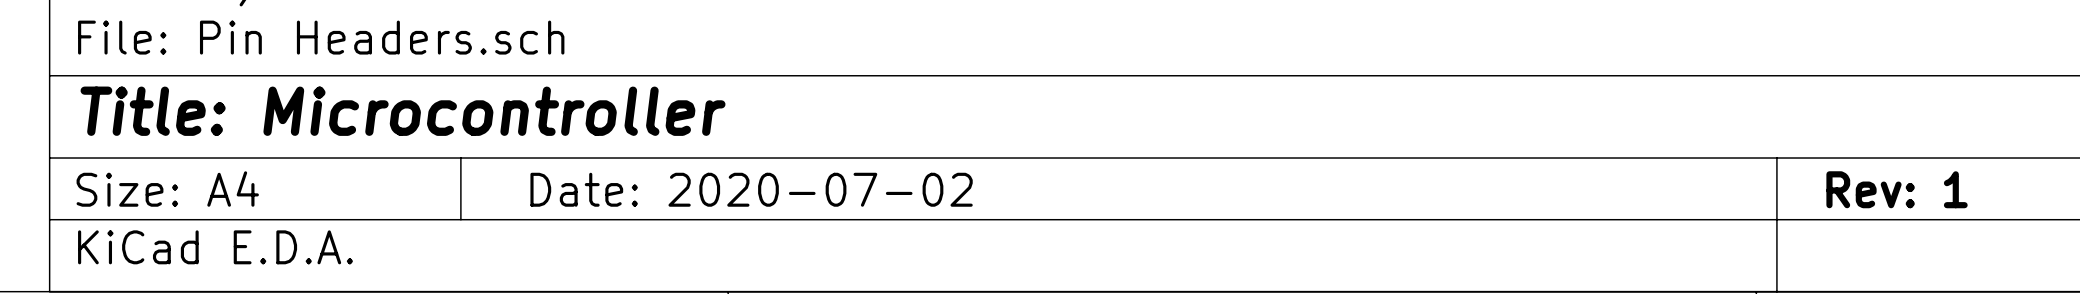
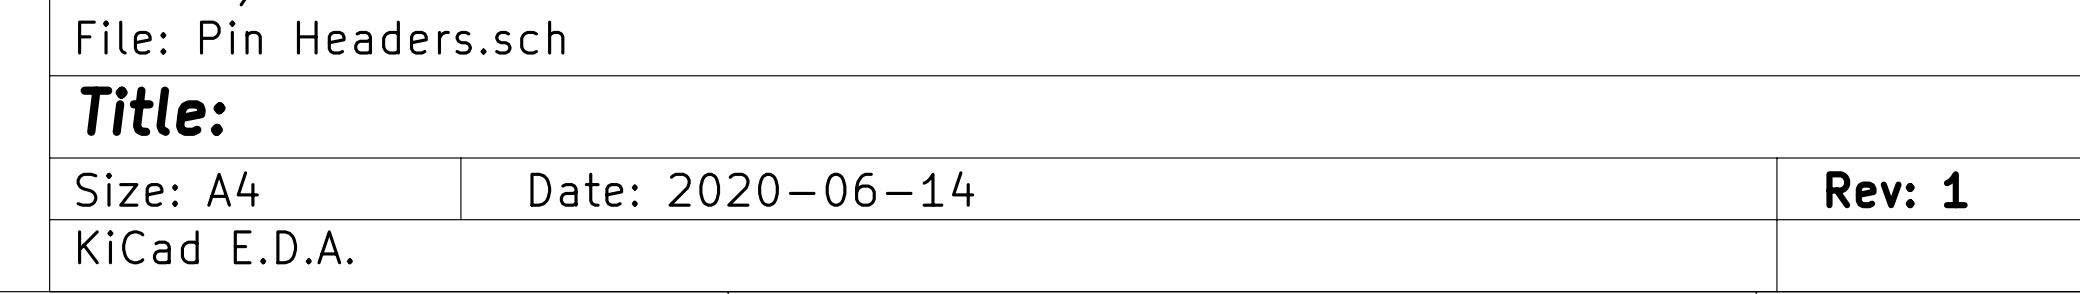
title block: Title: Microcontroller (403, 111) -> Title: (153, 111)
title block: Date: 2020-07-02 (751, 189) -> Date: 2020-06-14 (752, 189)

